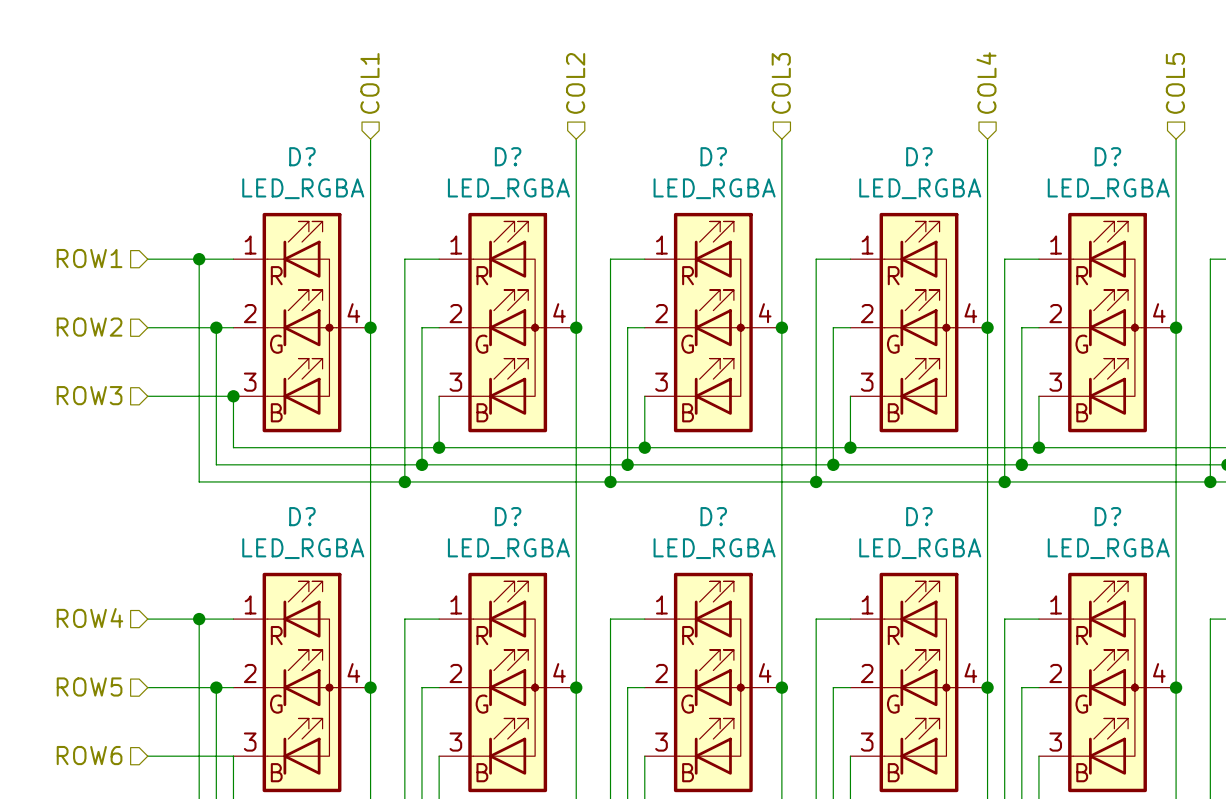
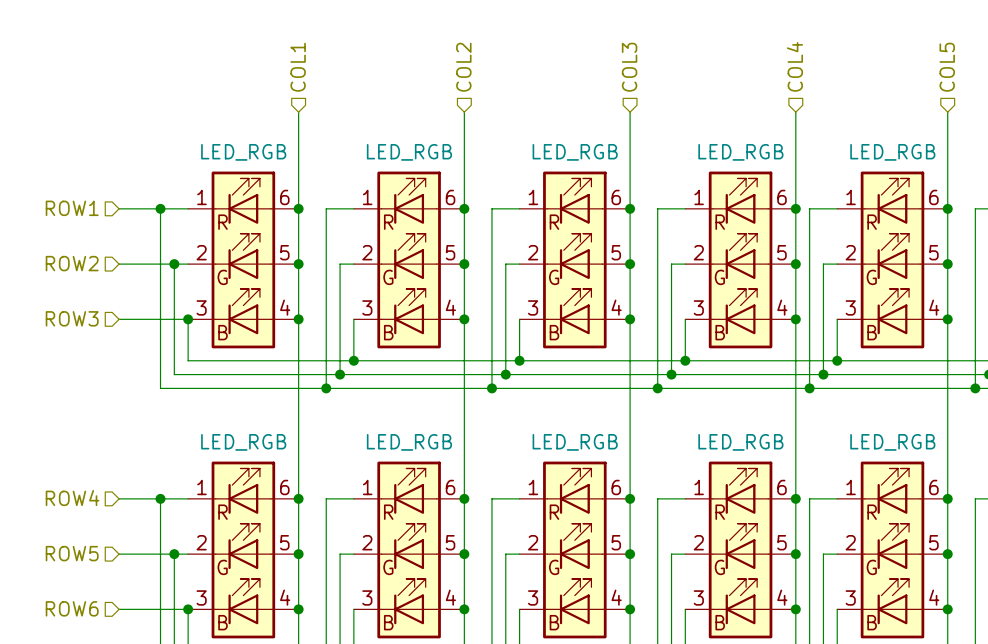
junction: none -> (298, 208)
junction: none -> (464, 208)
junction: none -> (630, 208)
junction: none -> (795, 208)
junction: none -> (947, 208)
D?: LED_RGBA (302, 322) -> none
part: none -> LED_RGB (243, 259)
D?: LED_RGBA (507, 322) -> none
part: none -> LED_RGB (409, 259)
D?: LED_RGBA (713, 322) -> none
part: none -> LED_RGB (574, 259)
D?: LED_RGBA (918, 322) -> none
part: none -> LED_RGB (740, 259)
D?: LED_RGBA (1107, 322) -> none
part: none -> LED_RGB (892, 259)
junction: none -> (298, 319)
junction: none -> (464, 319)
junction: none -> (630, 319)
junction: none -> (795, 319)
junction: none -> (947, 319)
junction: none -> (298, 498)
junction: none -> (464, 498)
junction: none -> (630, 498)
junction: none -> (795, 498)
junction: none -> (947, 498)
D?: LED_RGBA (302, 682) -> none
part: none -> LED_RGB (243, 549)
D?: LED_RGBA (507, 682) -> none
part: none -> LED_RGB (409, 549)
D?: LED_RGBA (713, 682) -> none
part: none -> LED_RGB (574, 549)
D?: LED_RGBA (918, 682) -> none
part: none -> LED_RGB (740, 549)
D?: LED_RGBA (1107, 682) -> none
part: none -> LED_RGB (892, 549)
junction: none -> (188, 609)
junction: none -> (298, 609)
junction: none -> (464, 609)
junction: none -> (630, 609)
junction: none -> (795, 609)
junction: none -> (947, 609)

